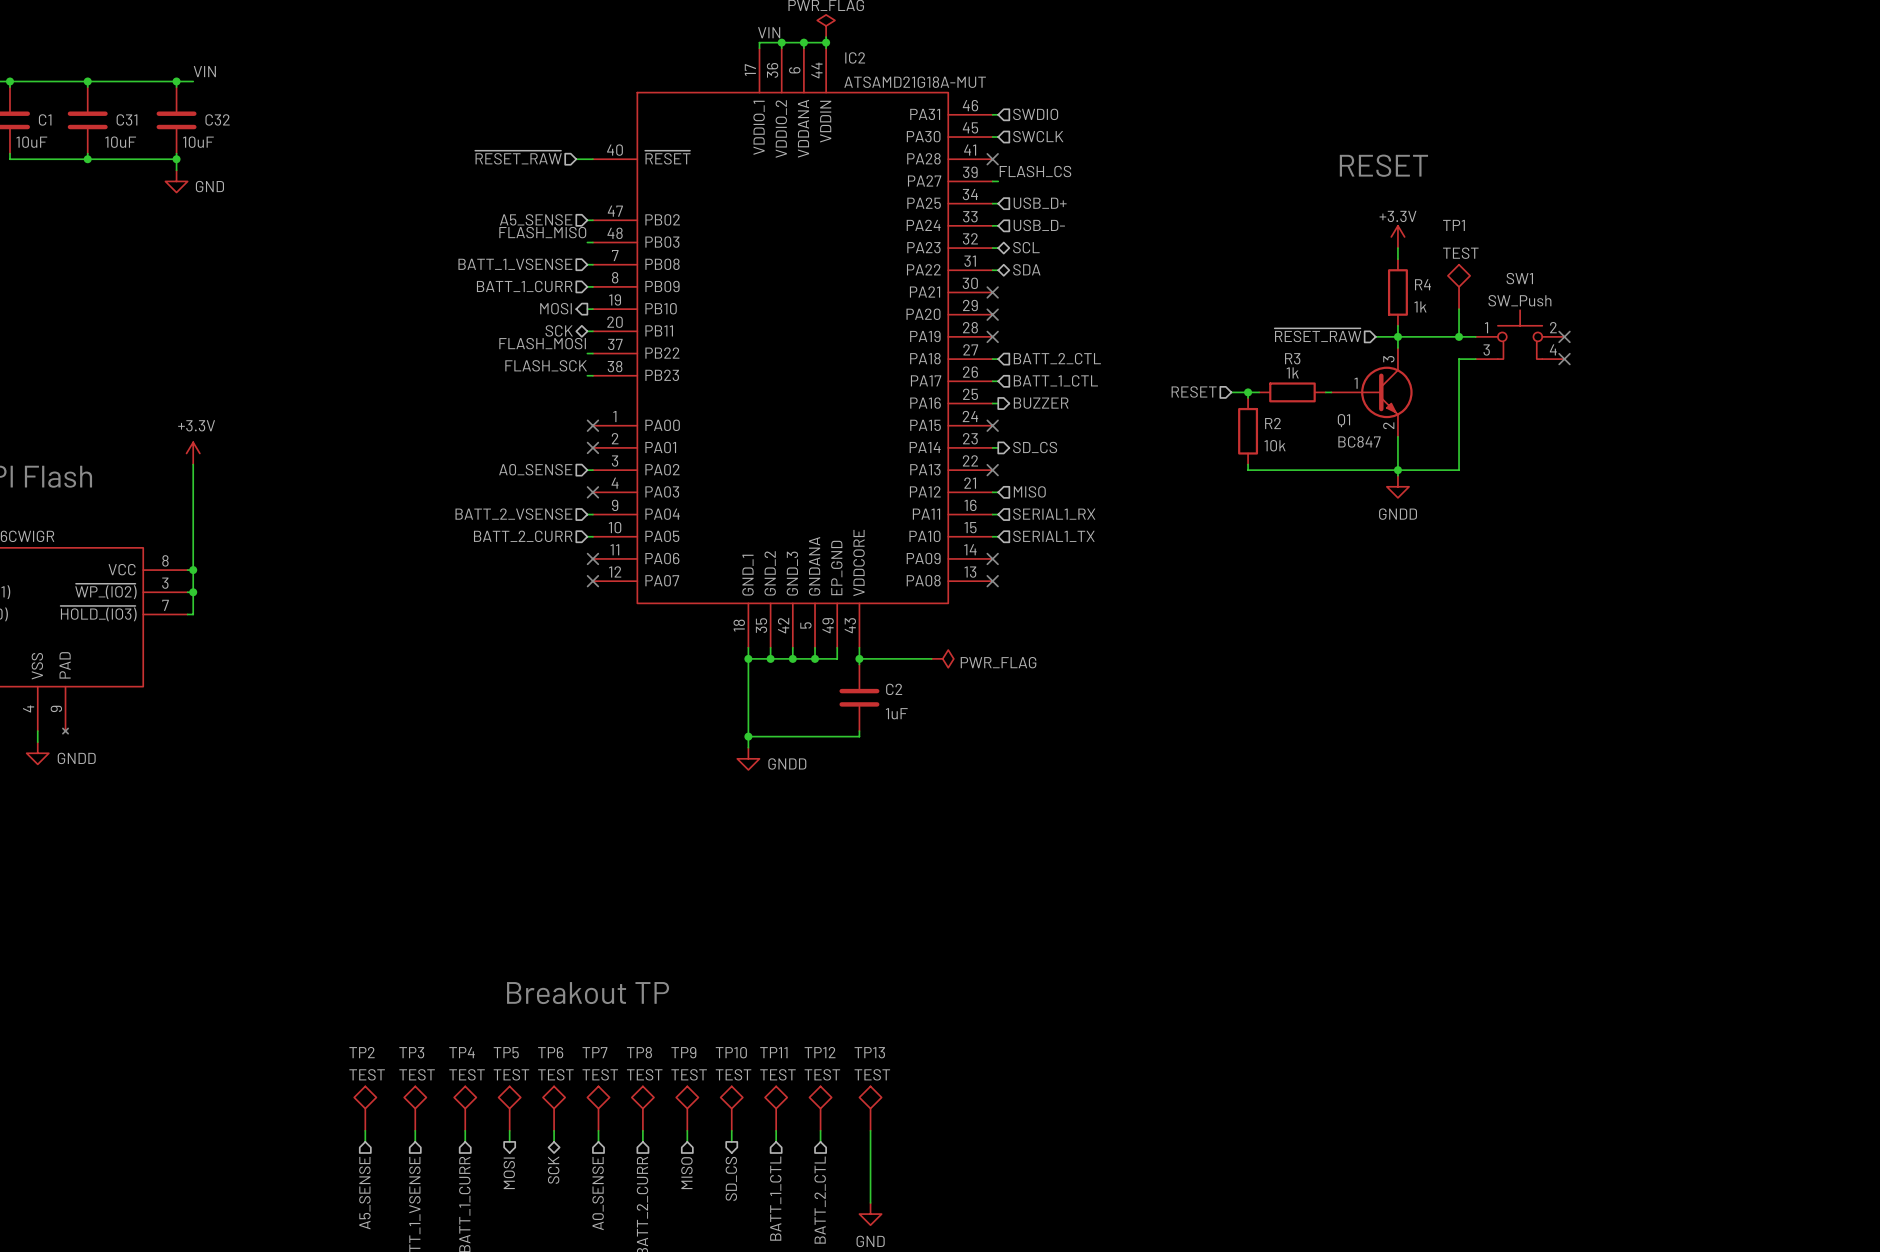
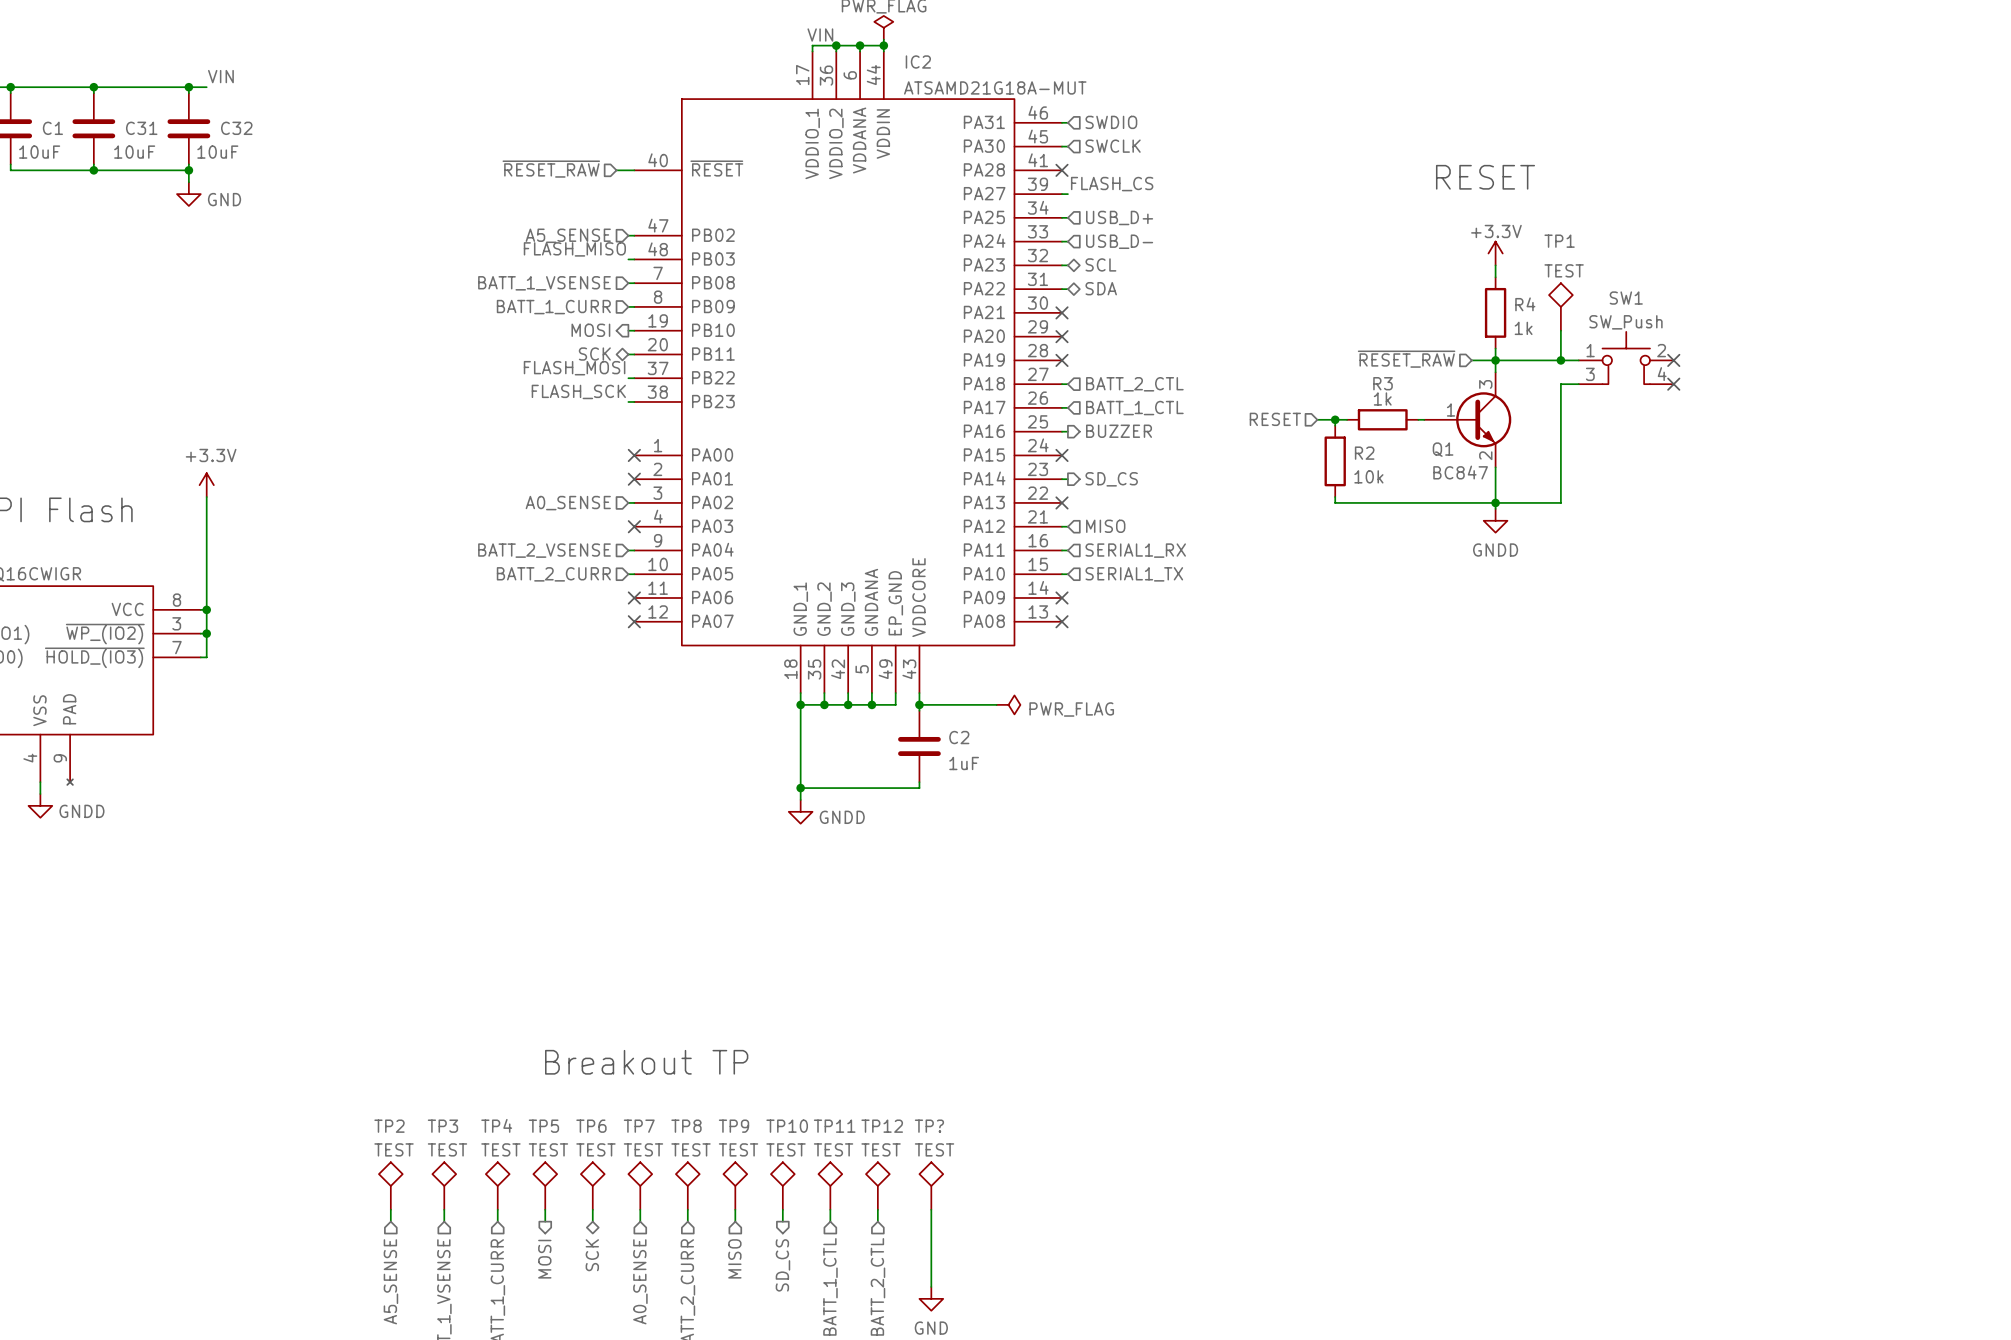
TP13 name: TP13 (869, 1052) -> TP? (929, 1126)

